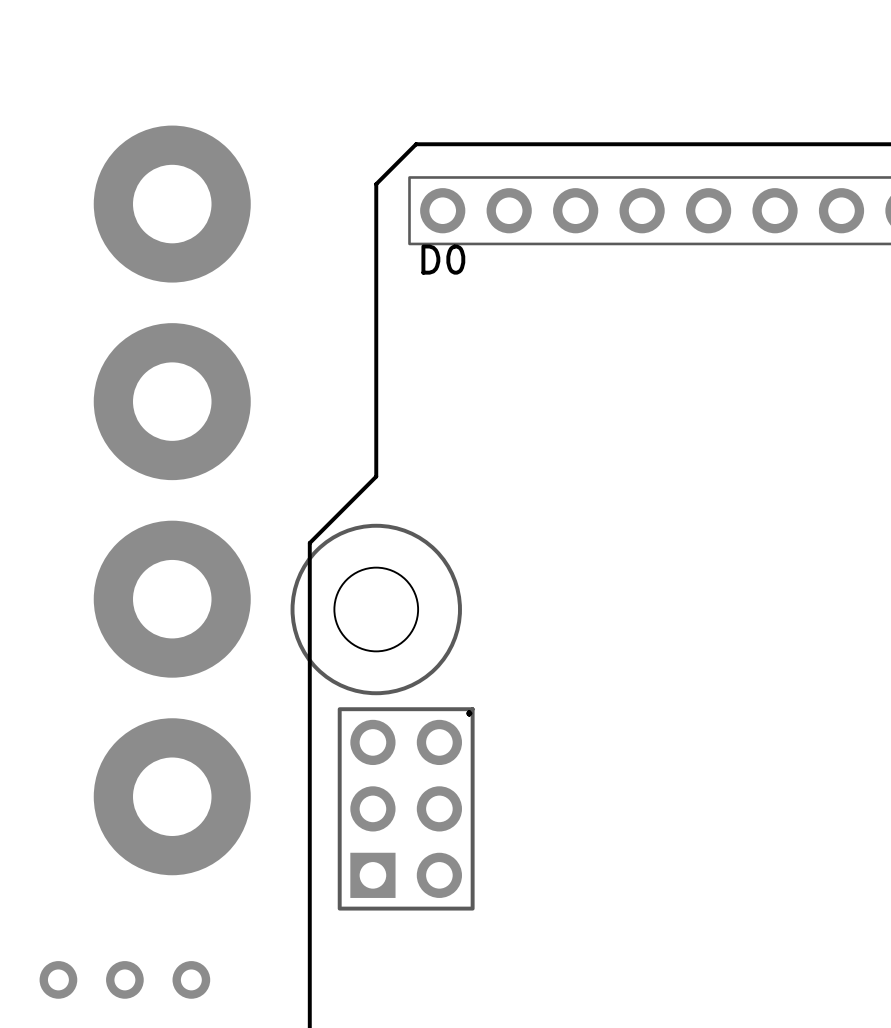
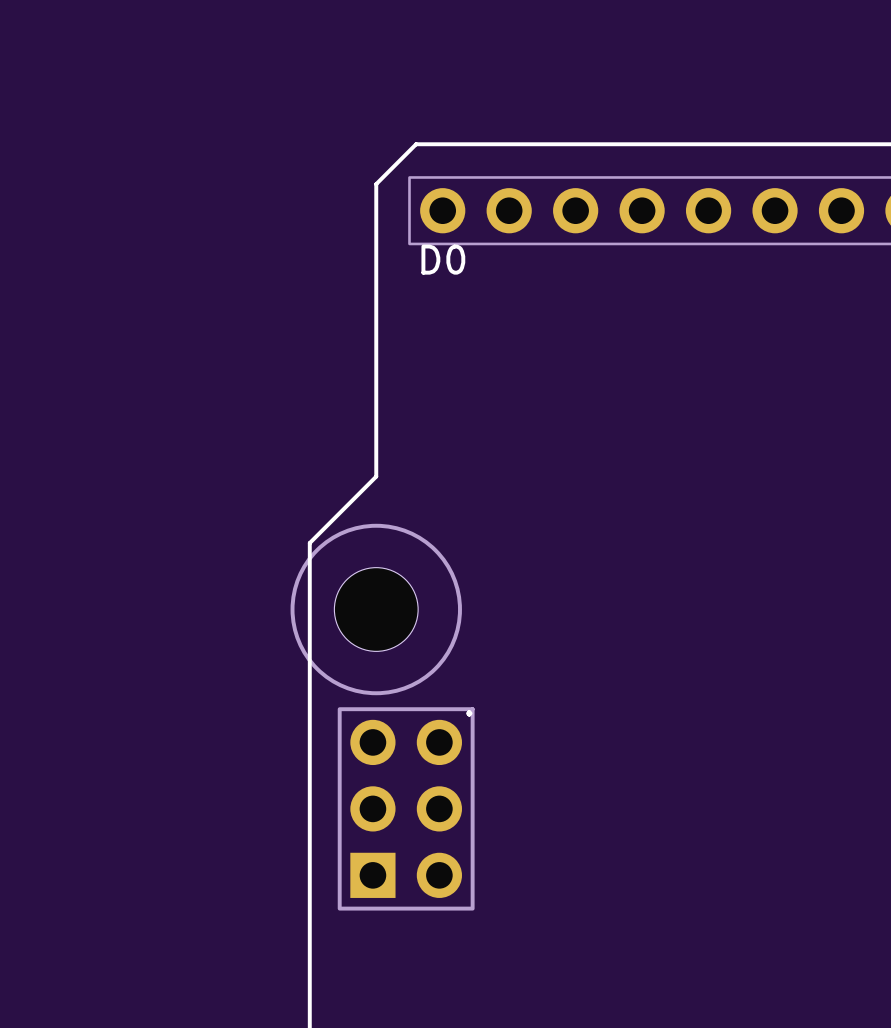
part: (172, 204) -> none
part: (172, 401) -> none
part: (172, 599) -> none
part: (172, 796) -> none
part: (124, 979) -> none

